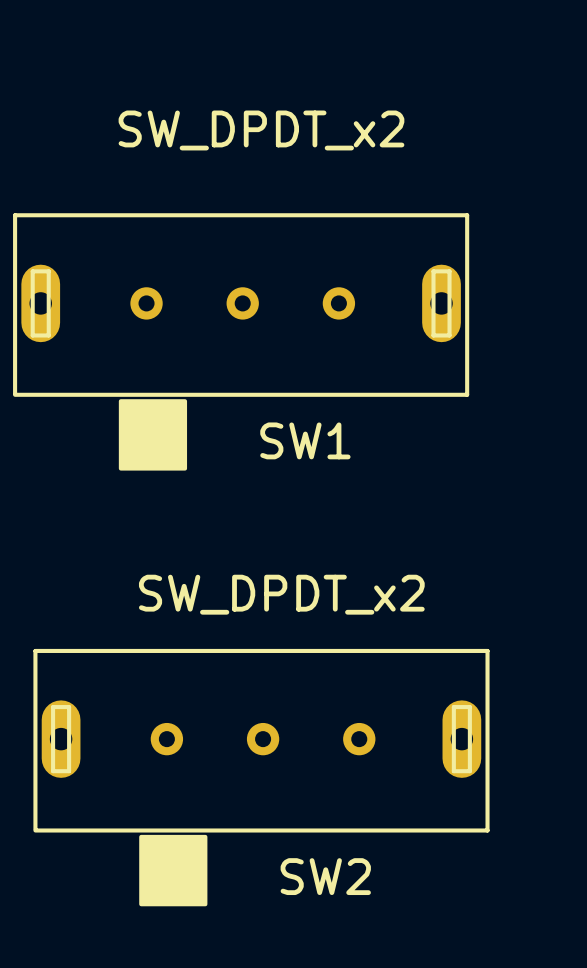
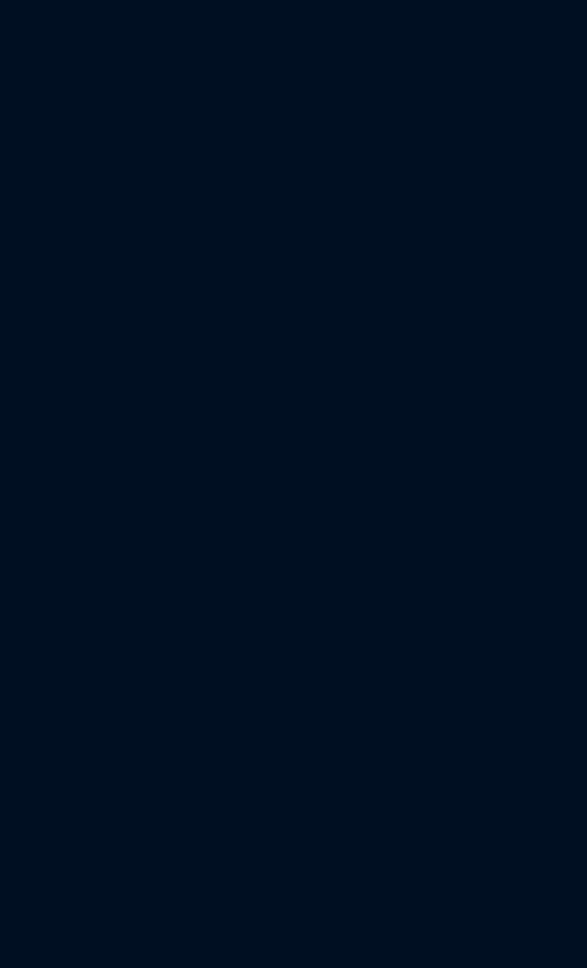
SW1: SW_DPDT_x2 (241, 341) -> none
SW2: SW_DPDT_x2 (261, 777) -> none

